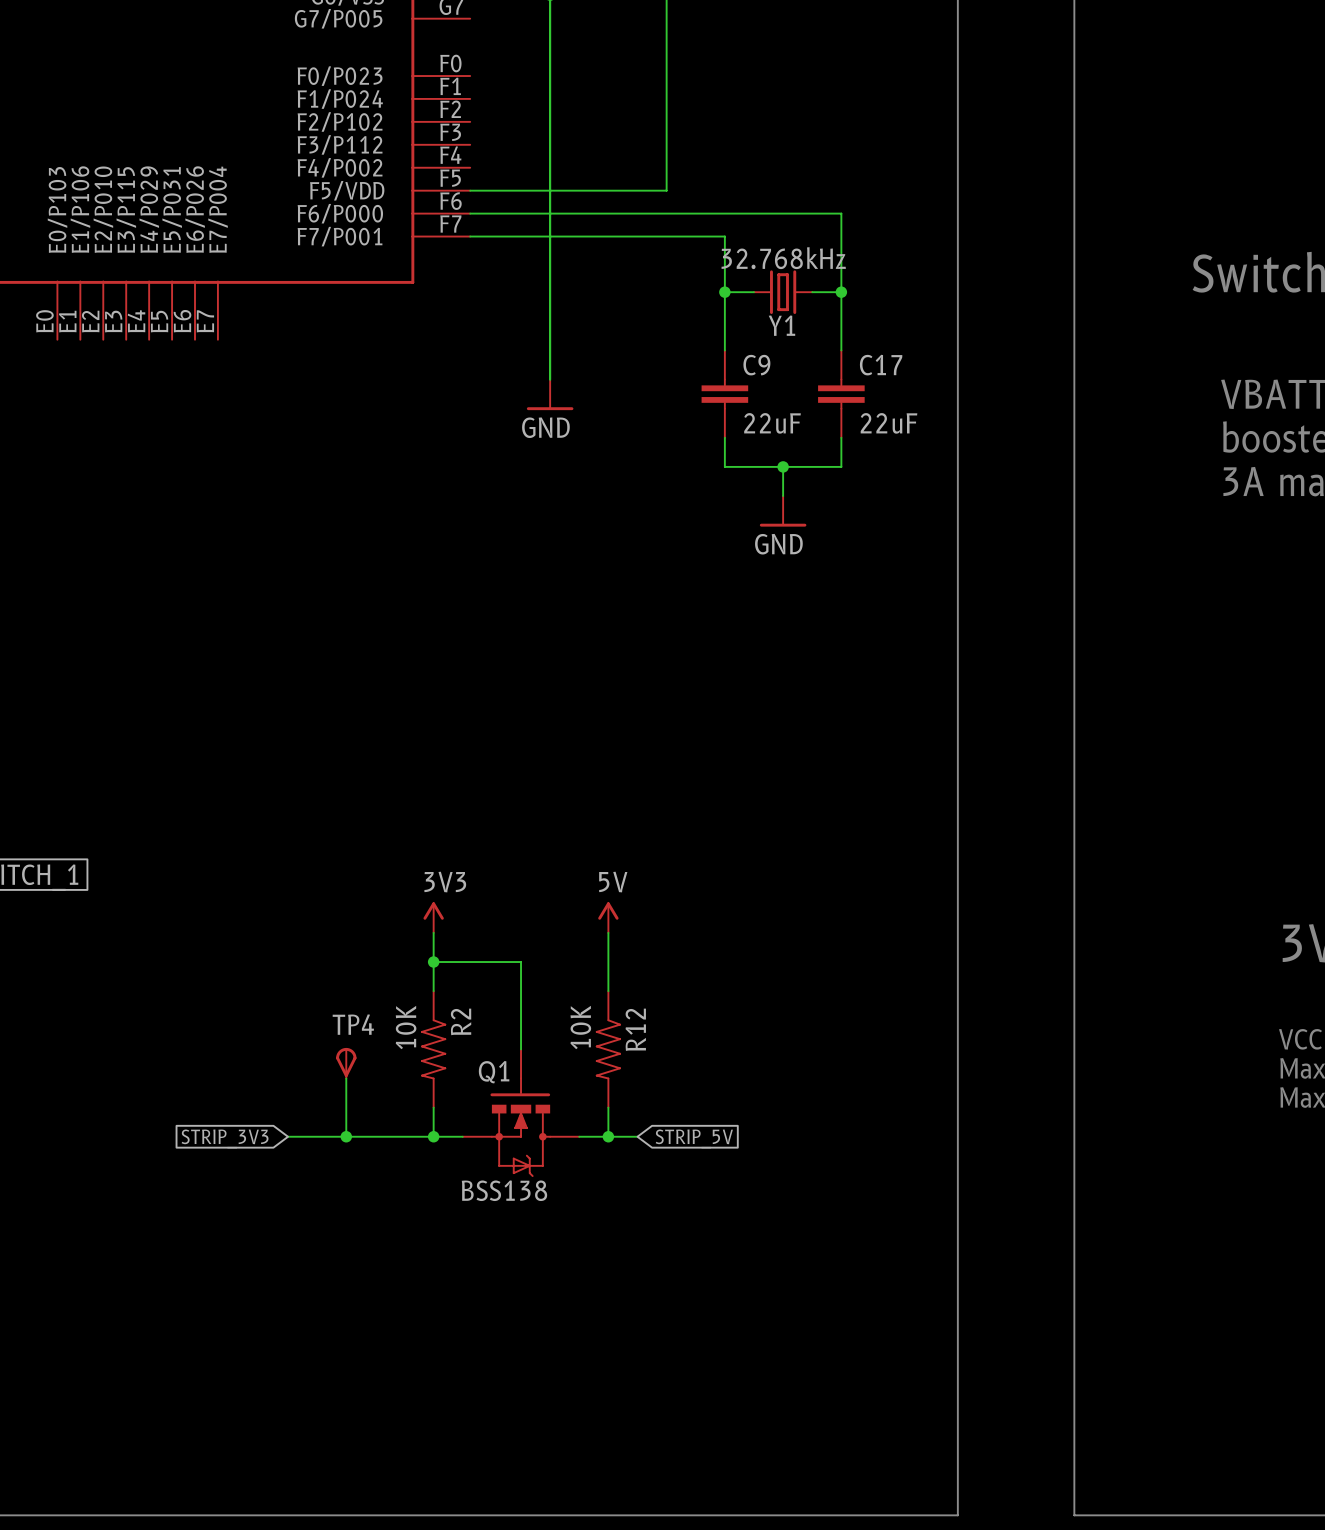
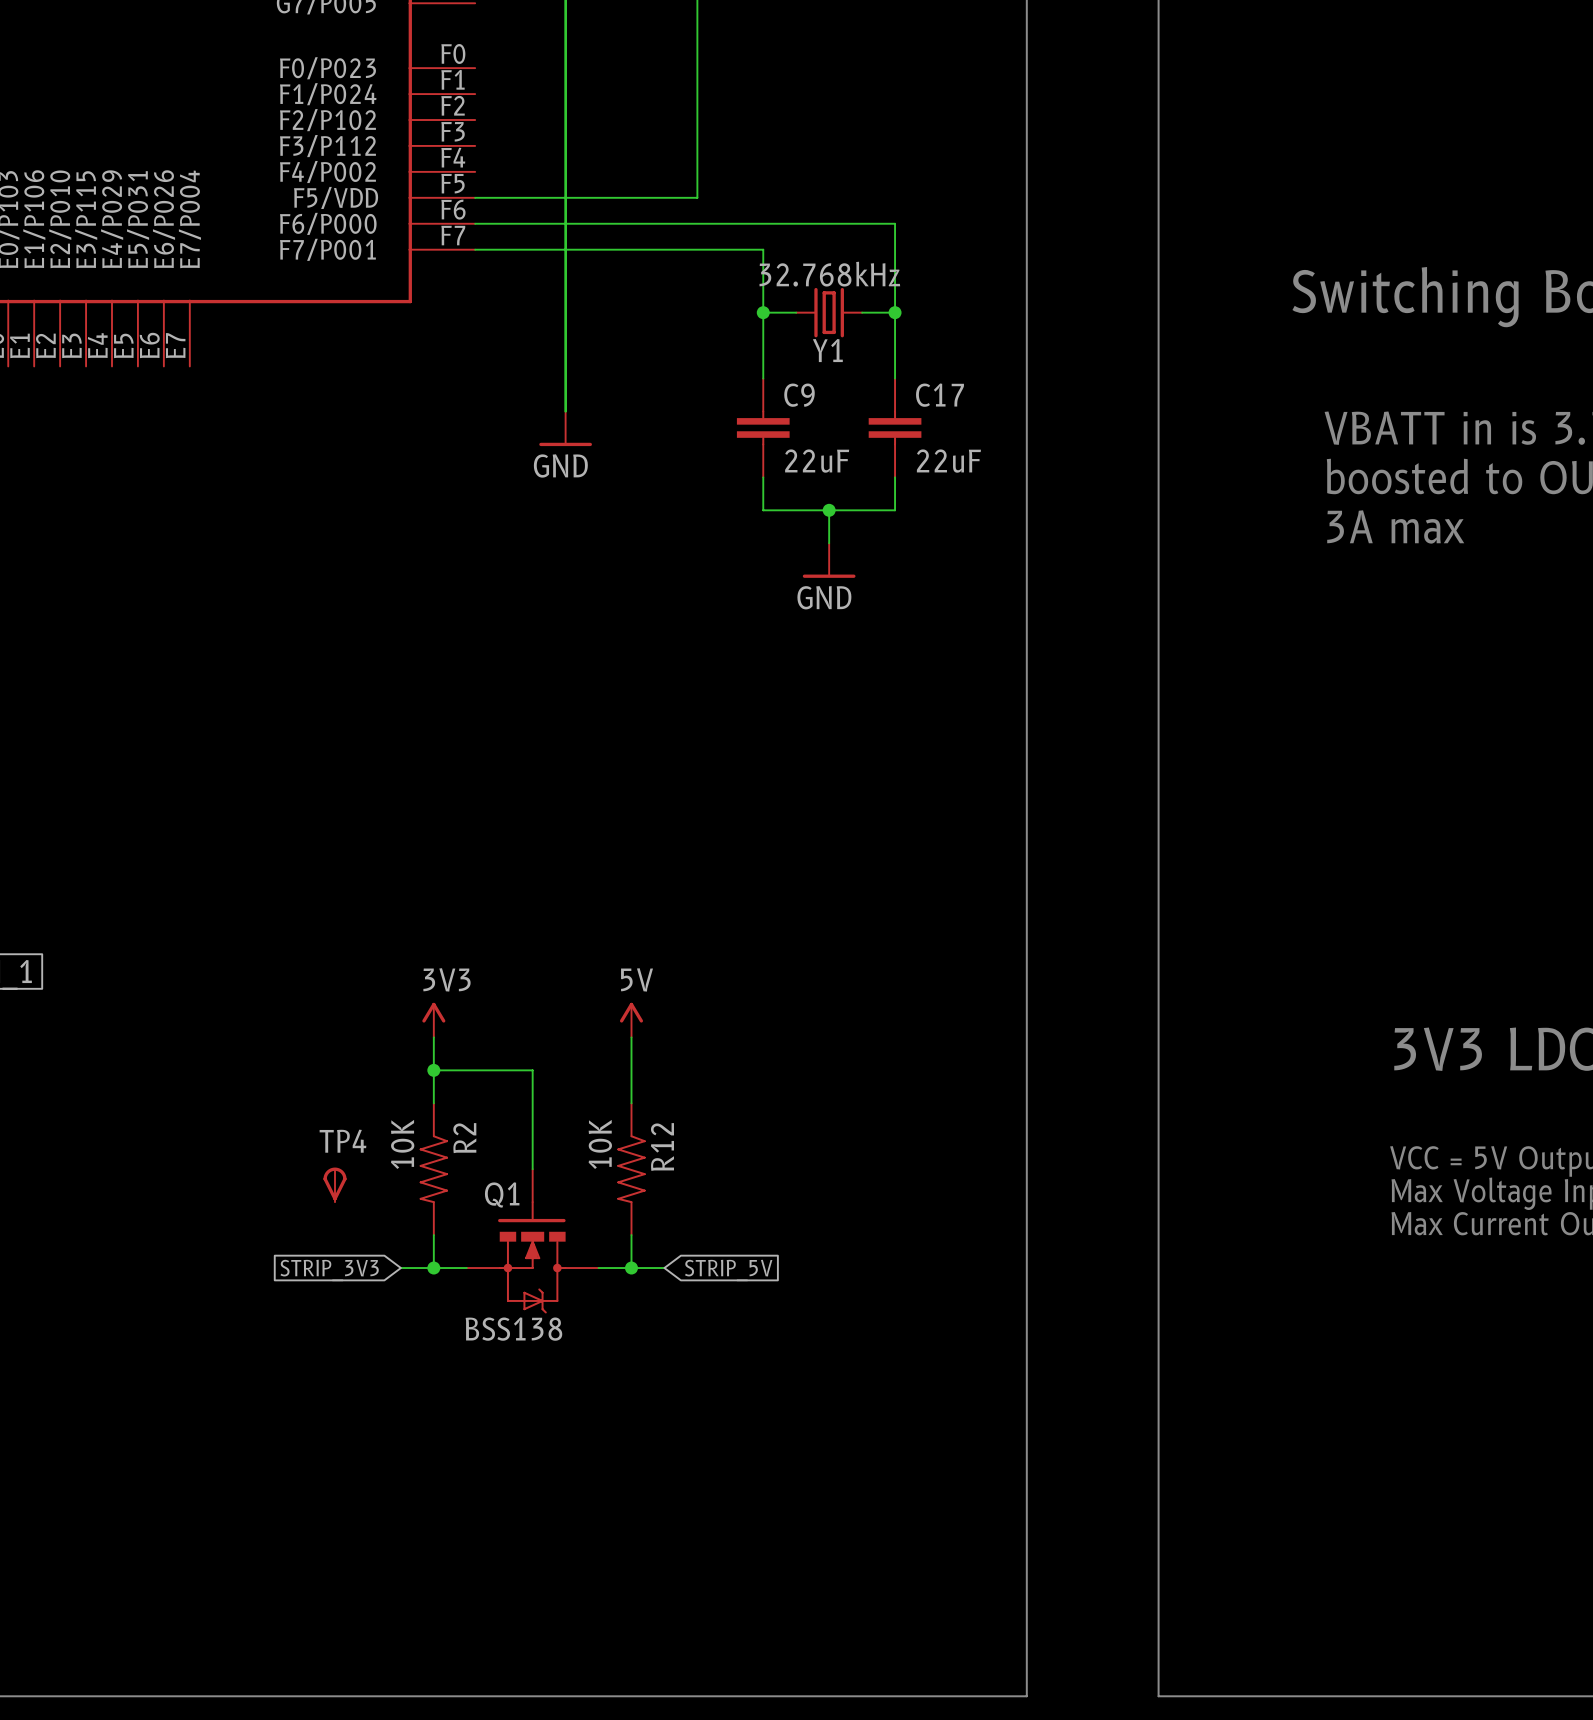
wire: (346, 1078) (346, 1136) -> none
wire: (288, 1136) (404, 1136) -> none
junction: (346, 1136) -> none
global label position: STRIP_3V3 (225, 1138) -> STRIP_3V3 (329, 1270)

